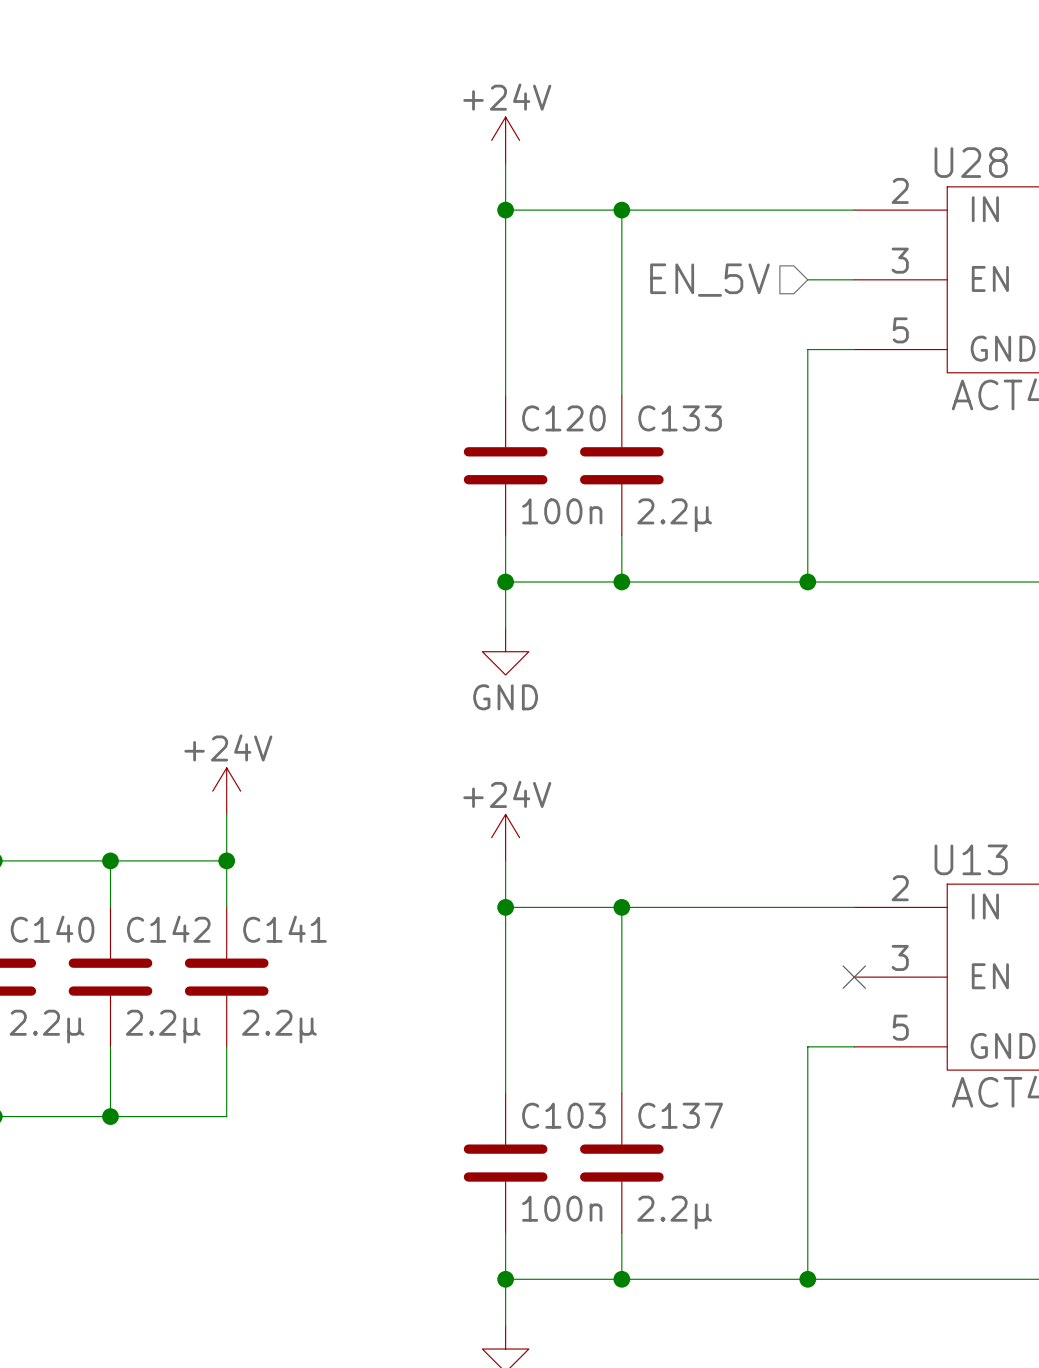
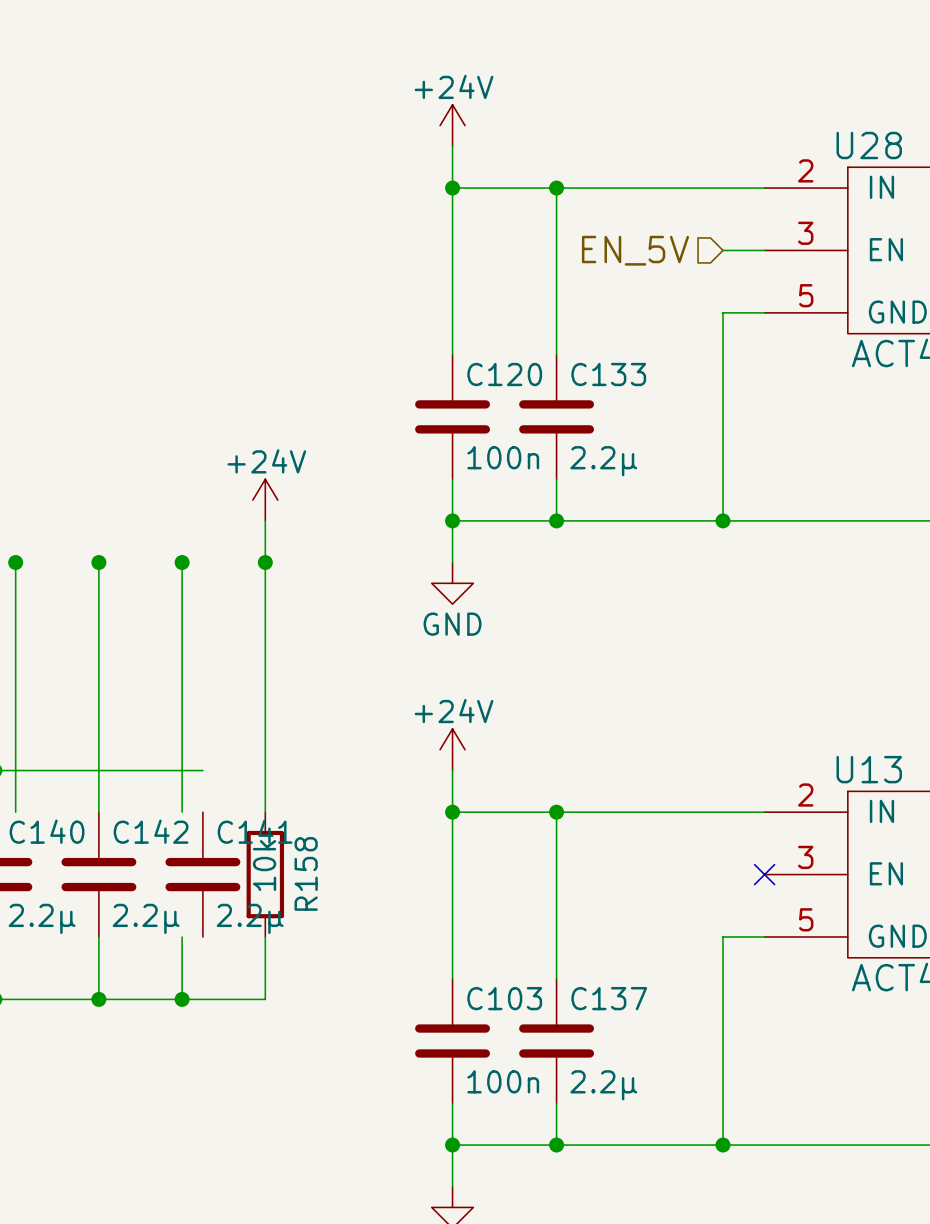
wire: none -> (265, 520) (265, 812)
wire: none -> (15, 562) (15, 812)
junction: none -> (15, 562)
wire: none -> (98, 562) (98, 770)
junction: none -> (98, 562)
wire: none -> (182, 562) (182, 812)
junction: none -> (182, 562)
junction: none -> (265, 562)
power symbol position: +24V (226, 791) -> +24V (265, 500)
wire: (226, 814) (226, 907) -> none
junction: (110, 860) -> none
junction: (226, 860) -> none
R158: none -> 10k (265, 874)
wire: none -> (182, 936) (182, 999)
wire: (226, 1046) (226, 1116) -> (265, 936) (265, 999) (202, 999)
junction: none -> (182, 999)

